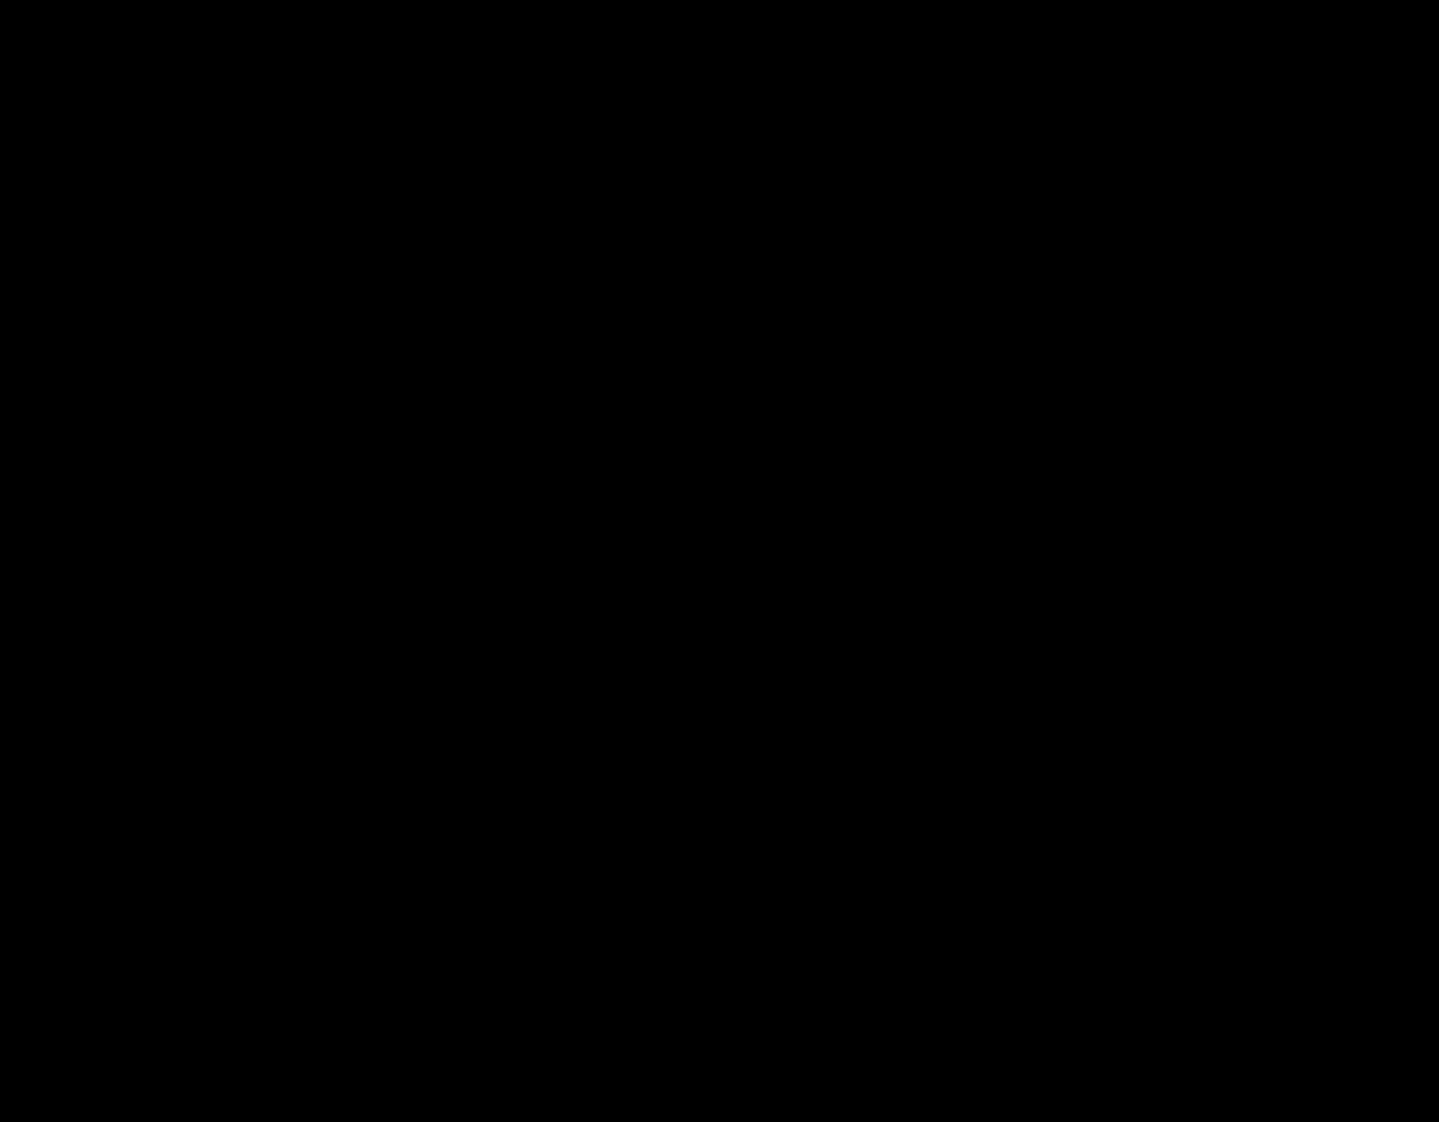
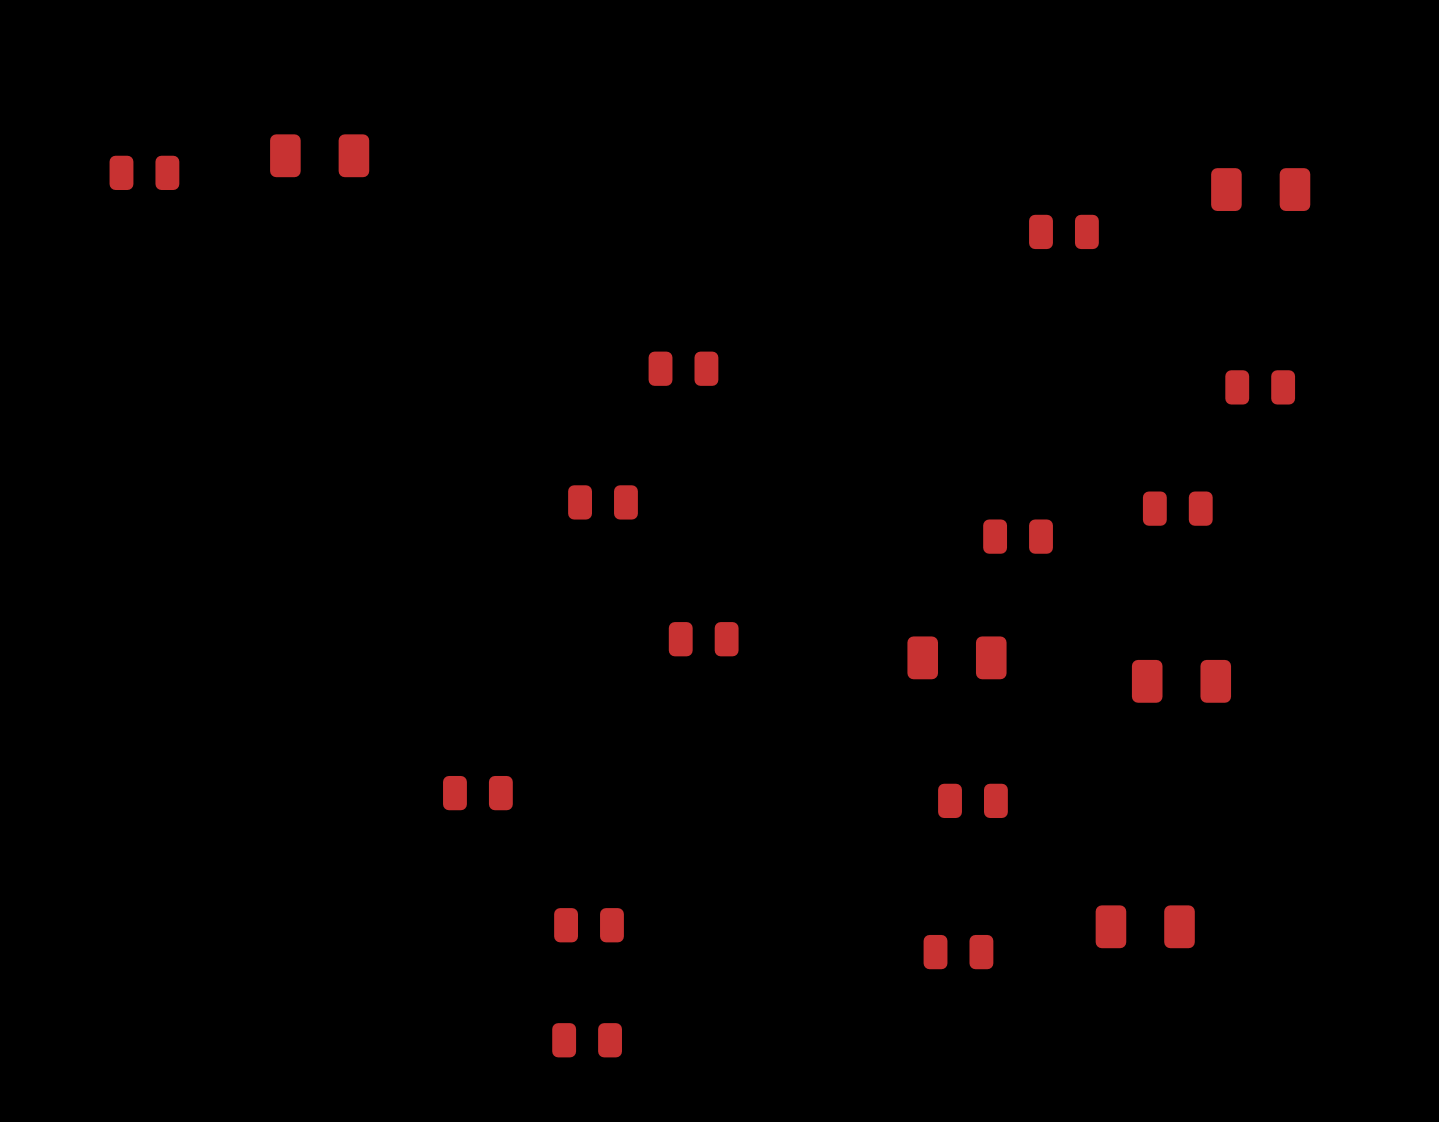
part: none -> (319, 155)
part: none -> (144, 172)
part: none -> (1260, 189)
part: none -> (1063, 231)
part: none -> (683, 368)
part: none -> (1260, 387)
part: none -> (603, 502)
part: none -> (1177, 508)
part: none -> (1018, 536)
part: none -> (703, 639)
part: none -> (956, 657)
part: none -> (1181, 681)
part: none -> (477, 793)
part: none -> (972, 800)
part: none -> (589, 925)
part: none -> (1145, 926)
part: none -> (958, 952)
part: none -> (587, 1040)

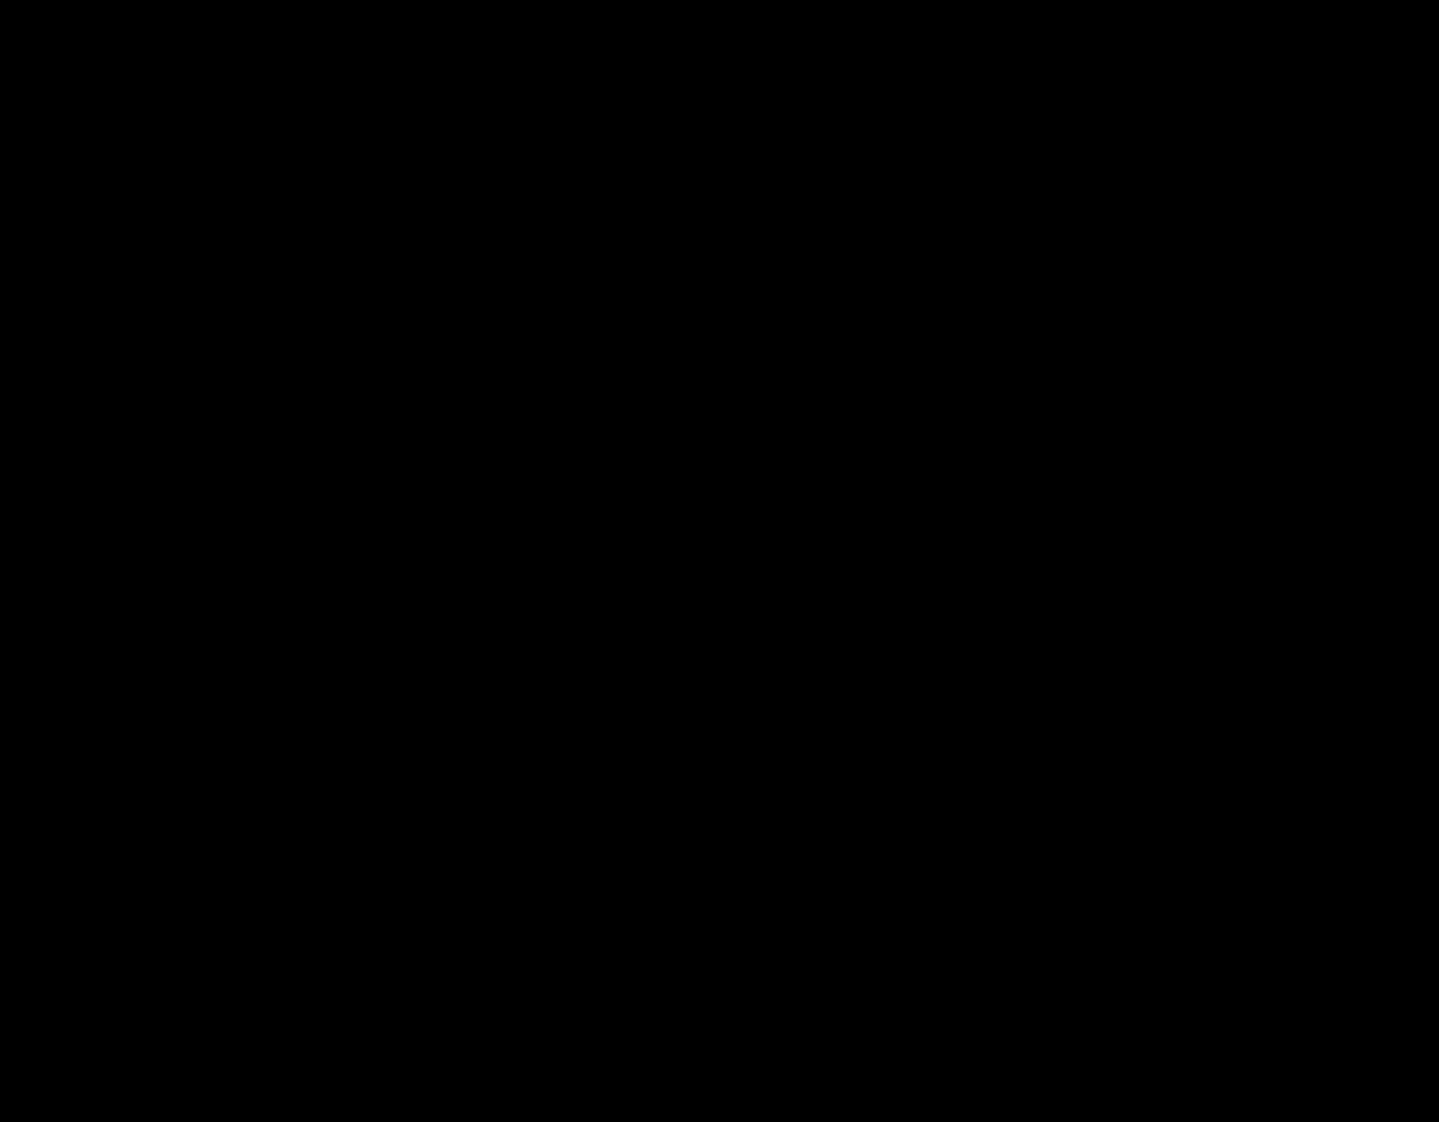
part: (319, 155) -> none
part: (144, 172) -> none
part: (1260, 189) -> none
part: (1063, 231) -> none
part: (683, 368) -> none
part: (1260, 387) -> none
part: (603, 502) -> none
part: (1177, 508) -> none
part: (1018, 536) -> none
part: (703, 639) -> none
part: (956, 657) -> none
part: (1181, 681) -> none
part: (477, 793) -> none
part: (972, 800) -> none
part: (589, 925) -> none
part: (1145, 926) -> none
part: (958, 952) -> none
part: (587, 1040) -> none

